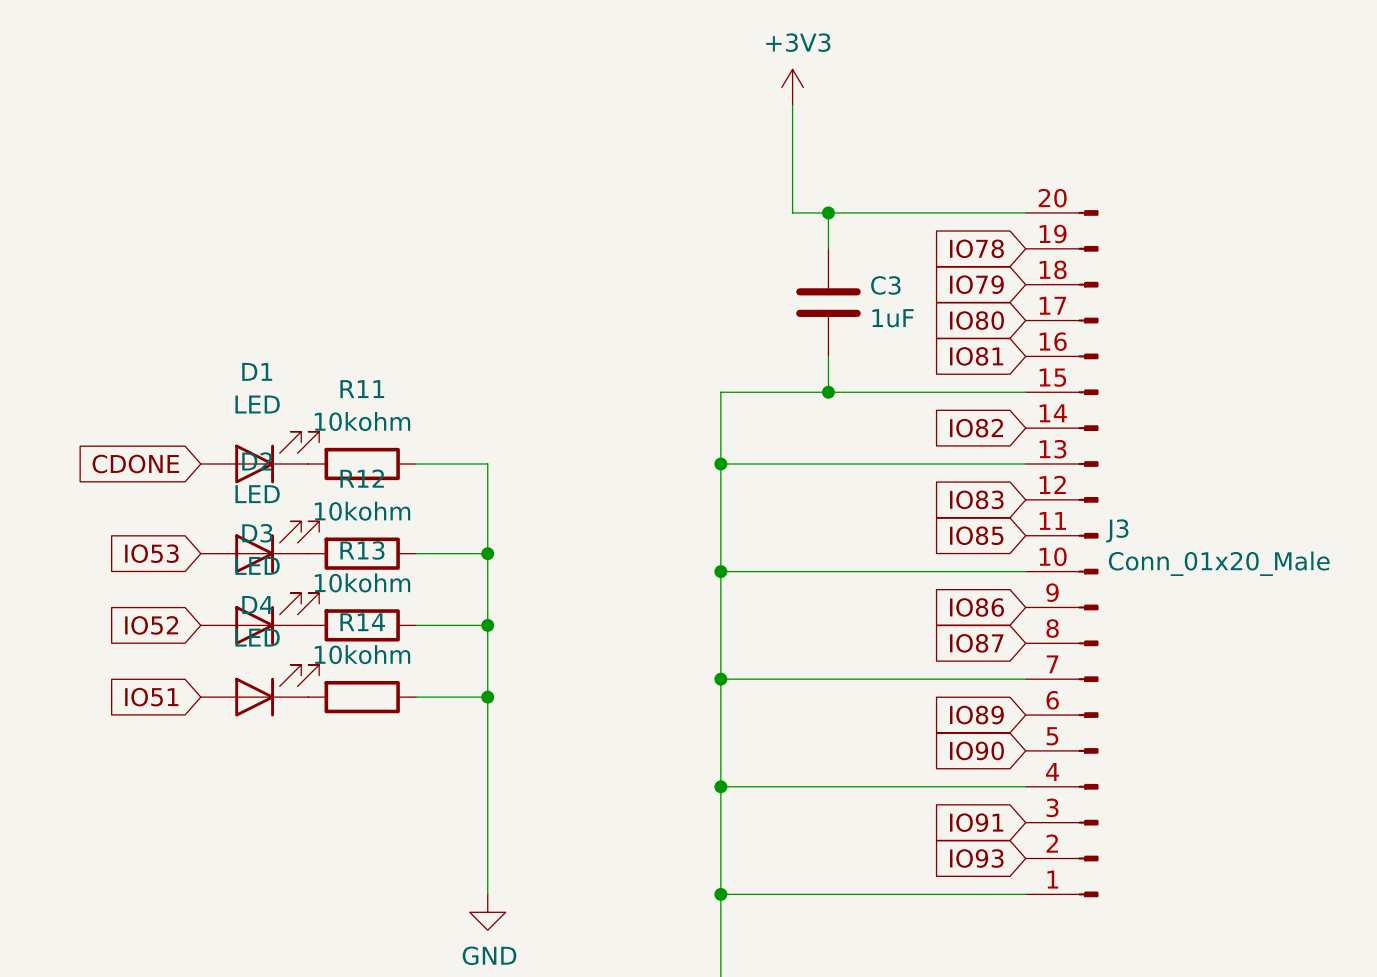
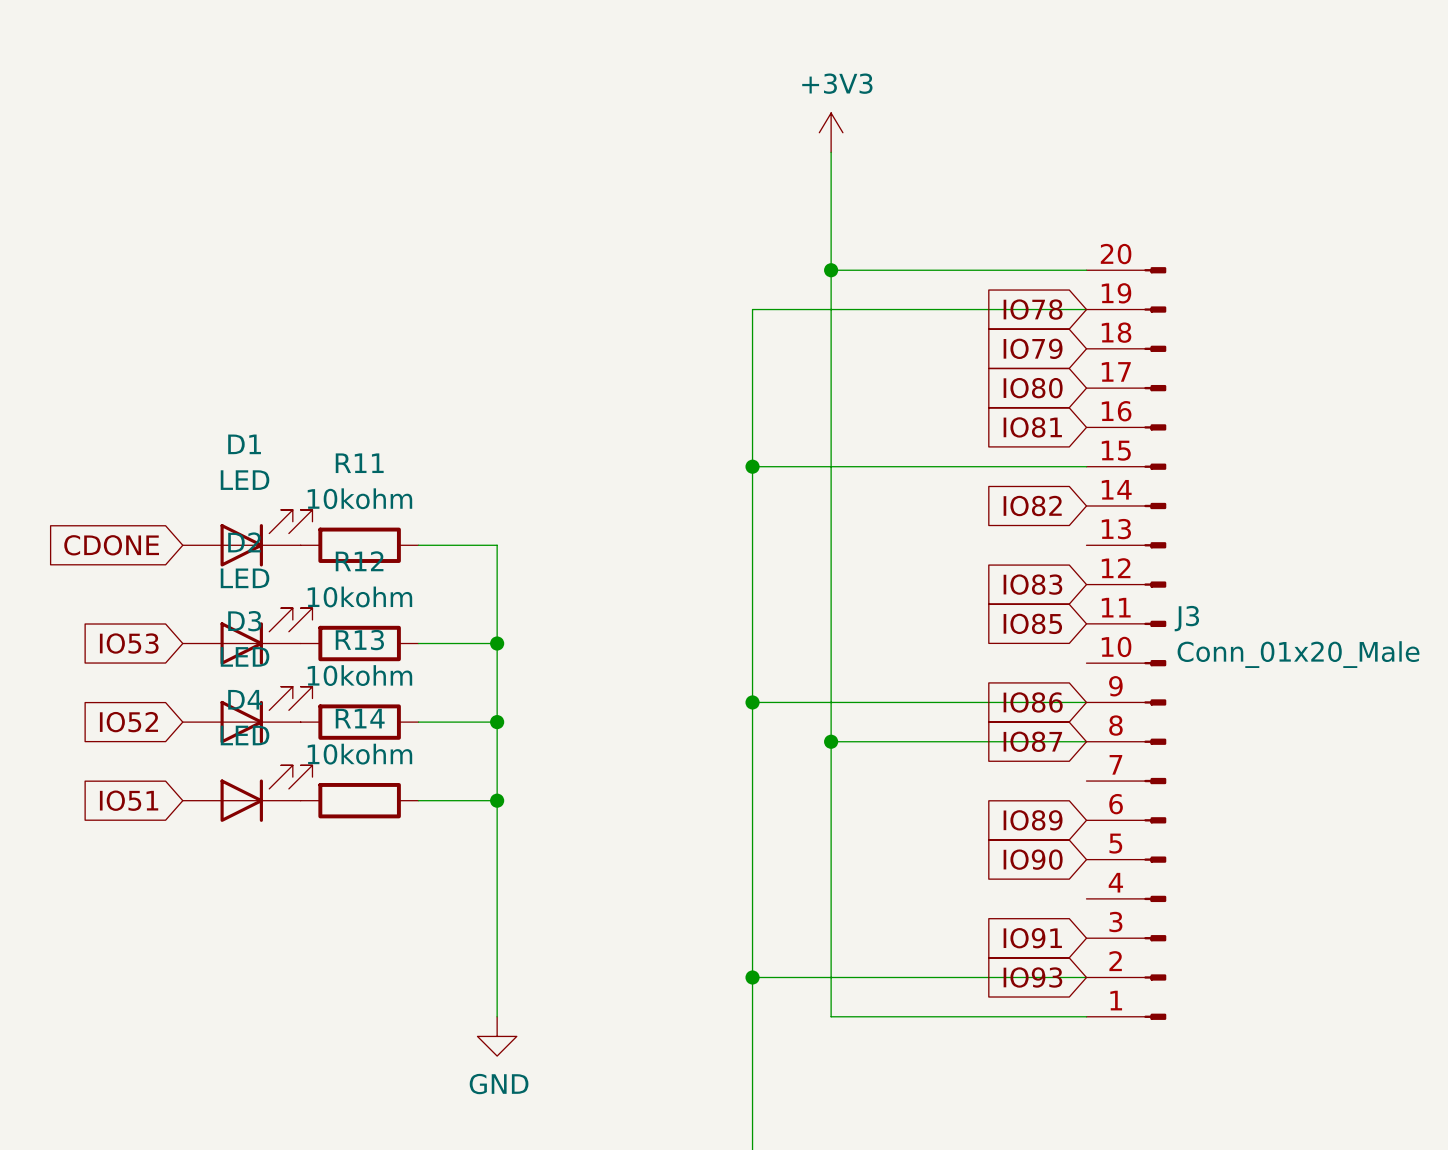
wire: (828, 212) (828, 248) -> none
junction position: (828, 212) -> (831, 270)
wire: none -> (1086, 309) (752, 309) (752, 466)
C3: 1uF (828, 302) -> none
wire: (828, 356) (828, 392) -> none
junction: none -> (752, 466)
junction: (828, 392) -> none
wire: (720, 464) (1025, 464) -> none
junction: (720, 464) -> none
wire: (720, 571) (1025, 571) -> (752, 702) (1086, 702)
junction: (720, 571) -> none
junction: none -> (752, 702)
wire: none -> (831, 741) (1086, 741)
junction: none -> (831, 741)
wire: (720, 679) (1025, 679) -> none
junction: (720, 679) -> none
wire: (720, 786) (1025, 786) -> (752, 977) (1086, 977)
junction: (720, 786) -> none
junction: none -> (752, 977)
wire: (720, 894) (792, 894) -> (831, 270) (831, 1016)
junction: (720, 894) -> none

